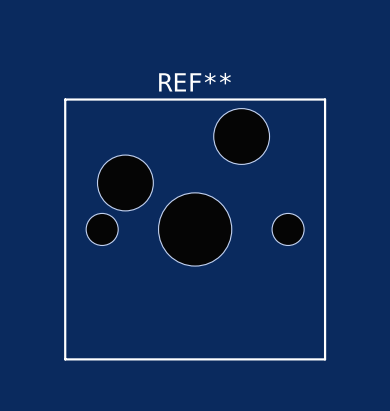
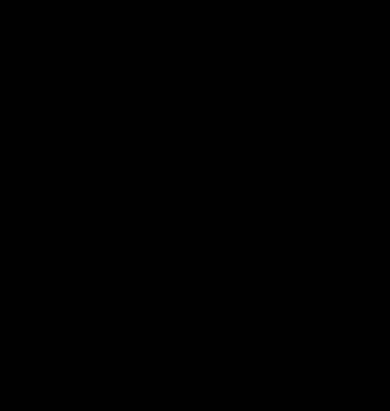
REF**: (195, 229) -> none

